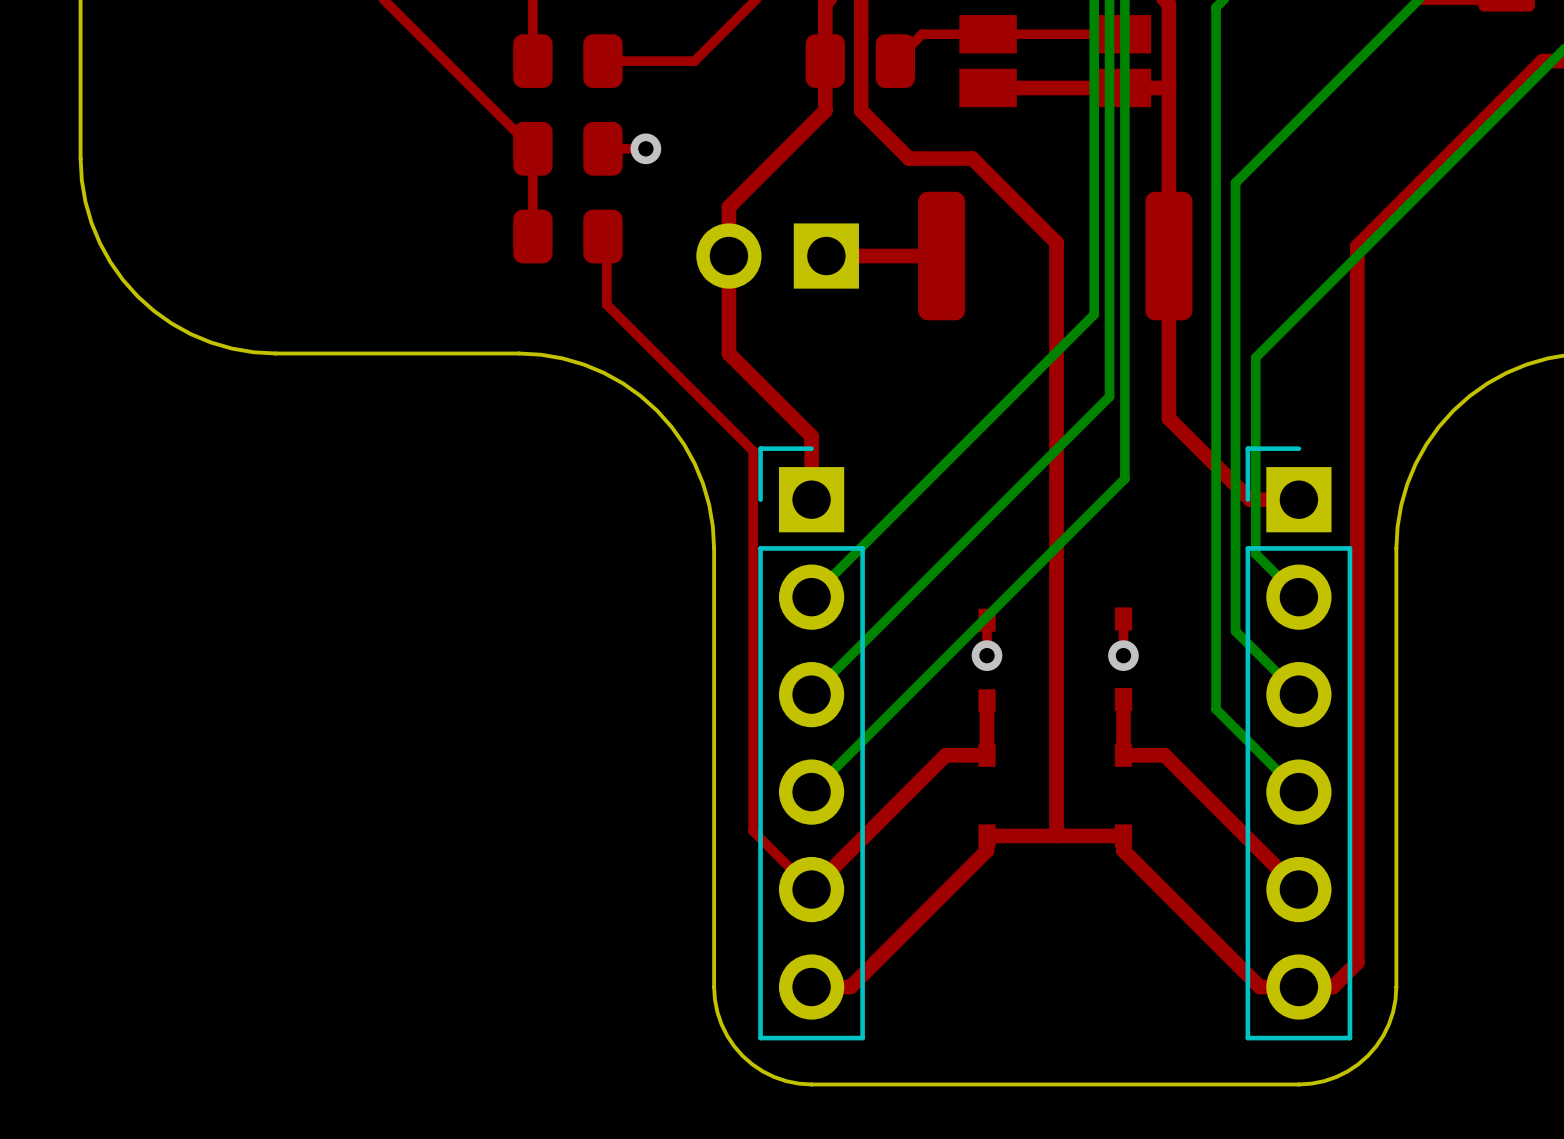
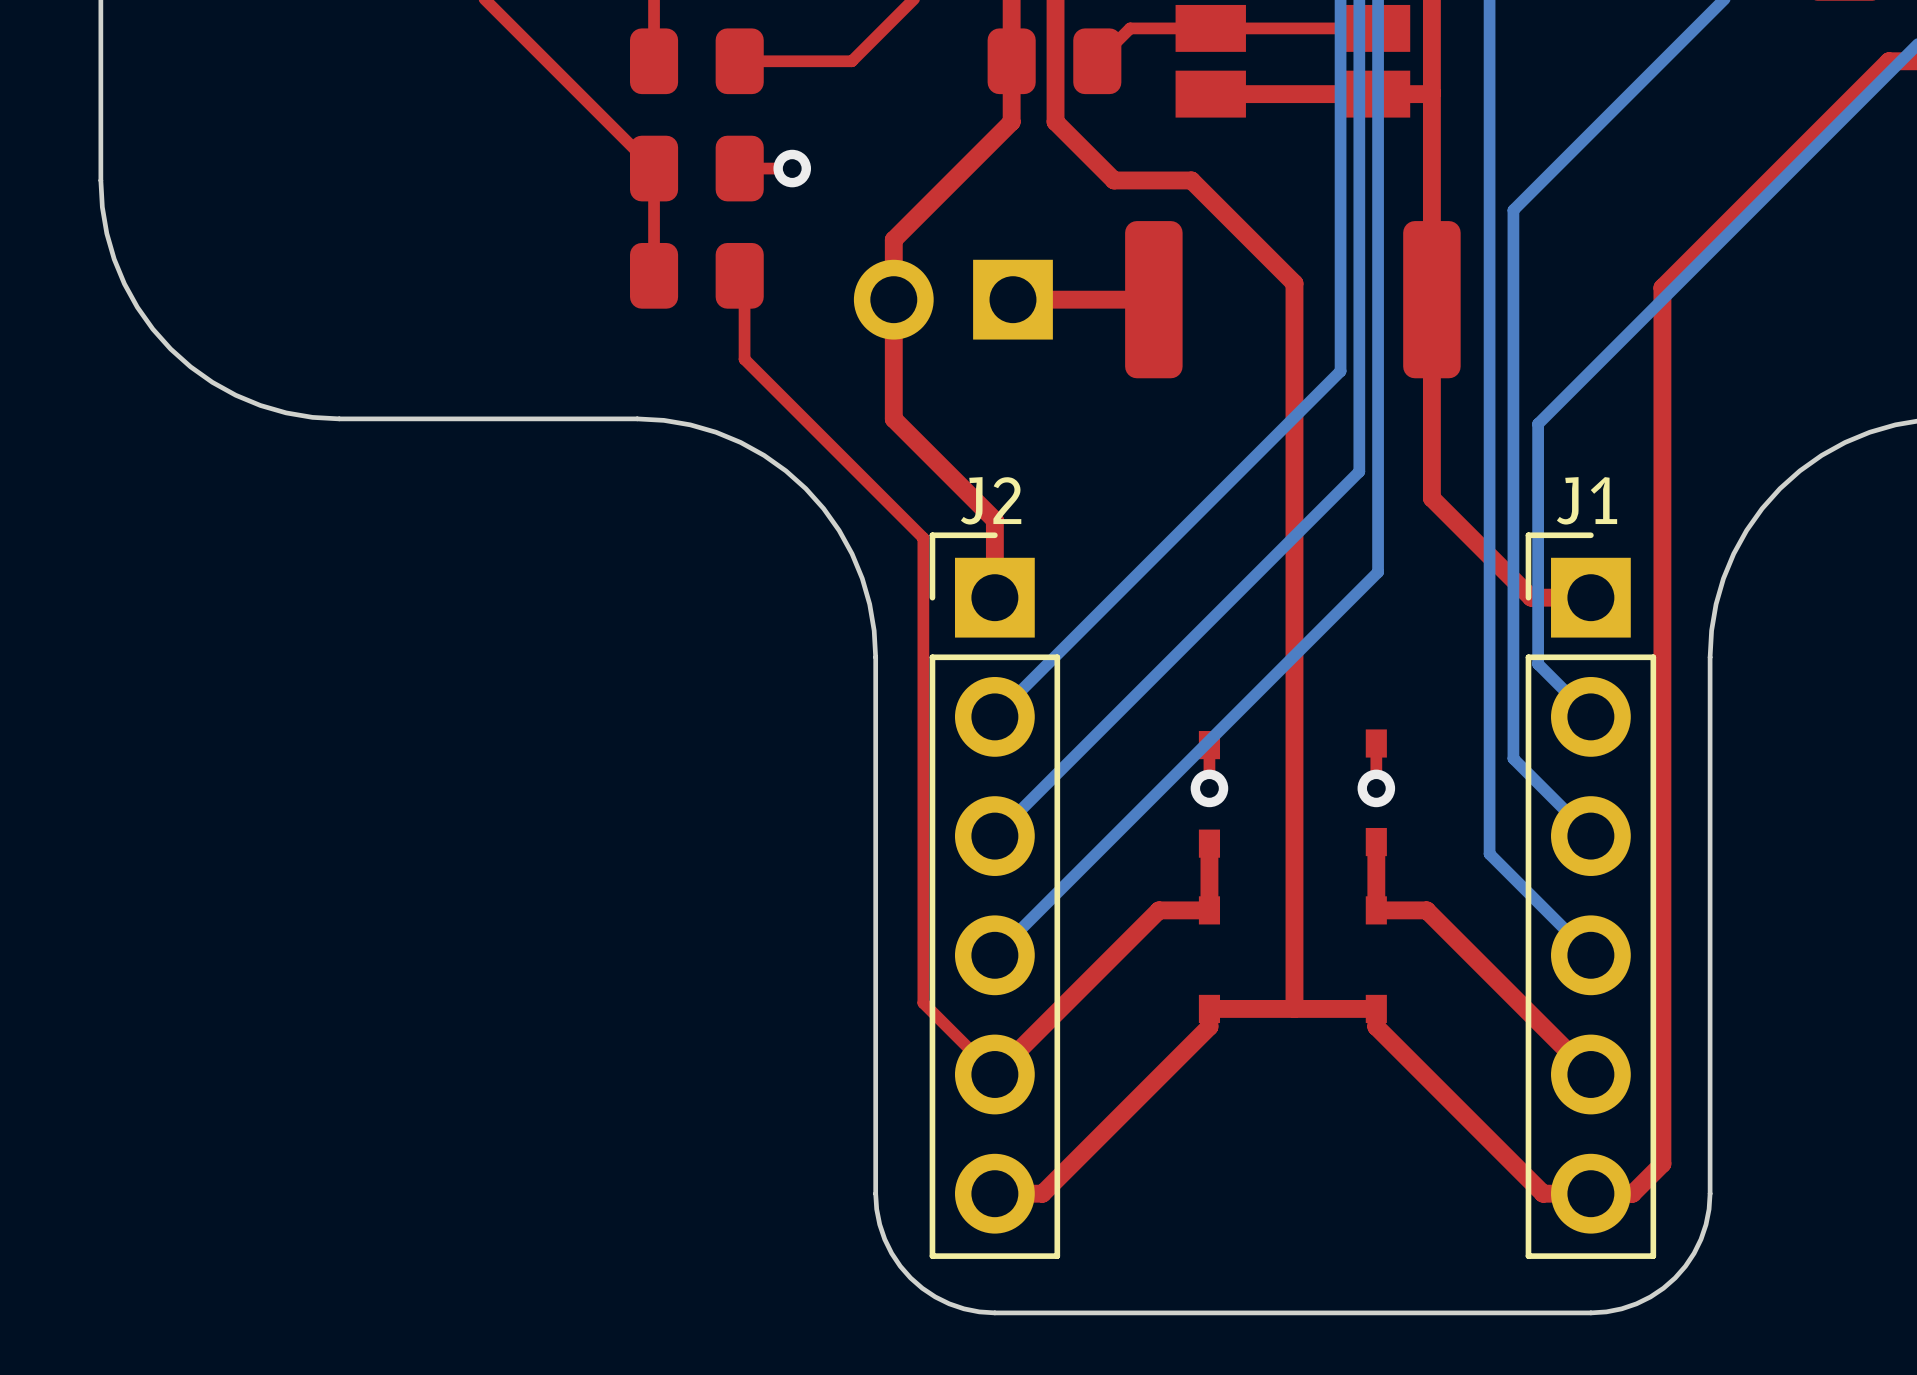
J2 name: none -> J2 (991, 500)
J1 name: none -> J1 (1587, 500)

